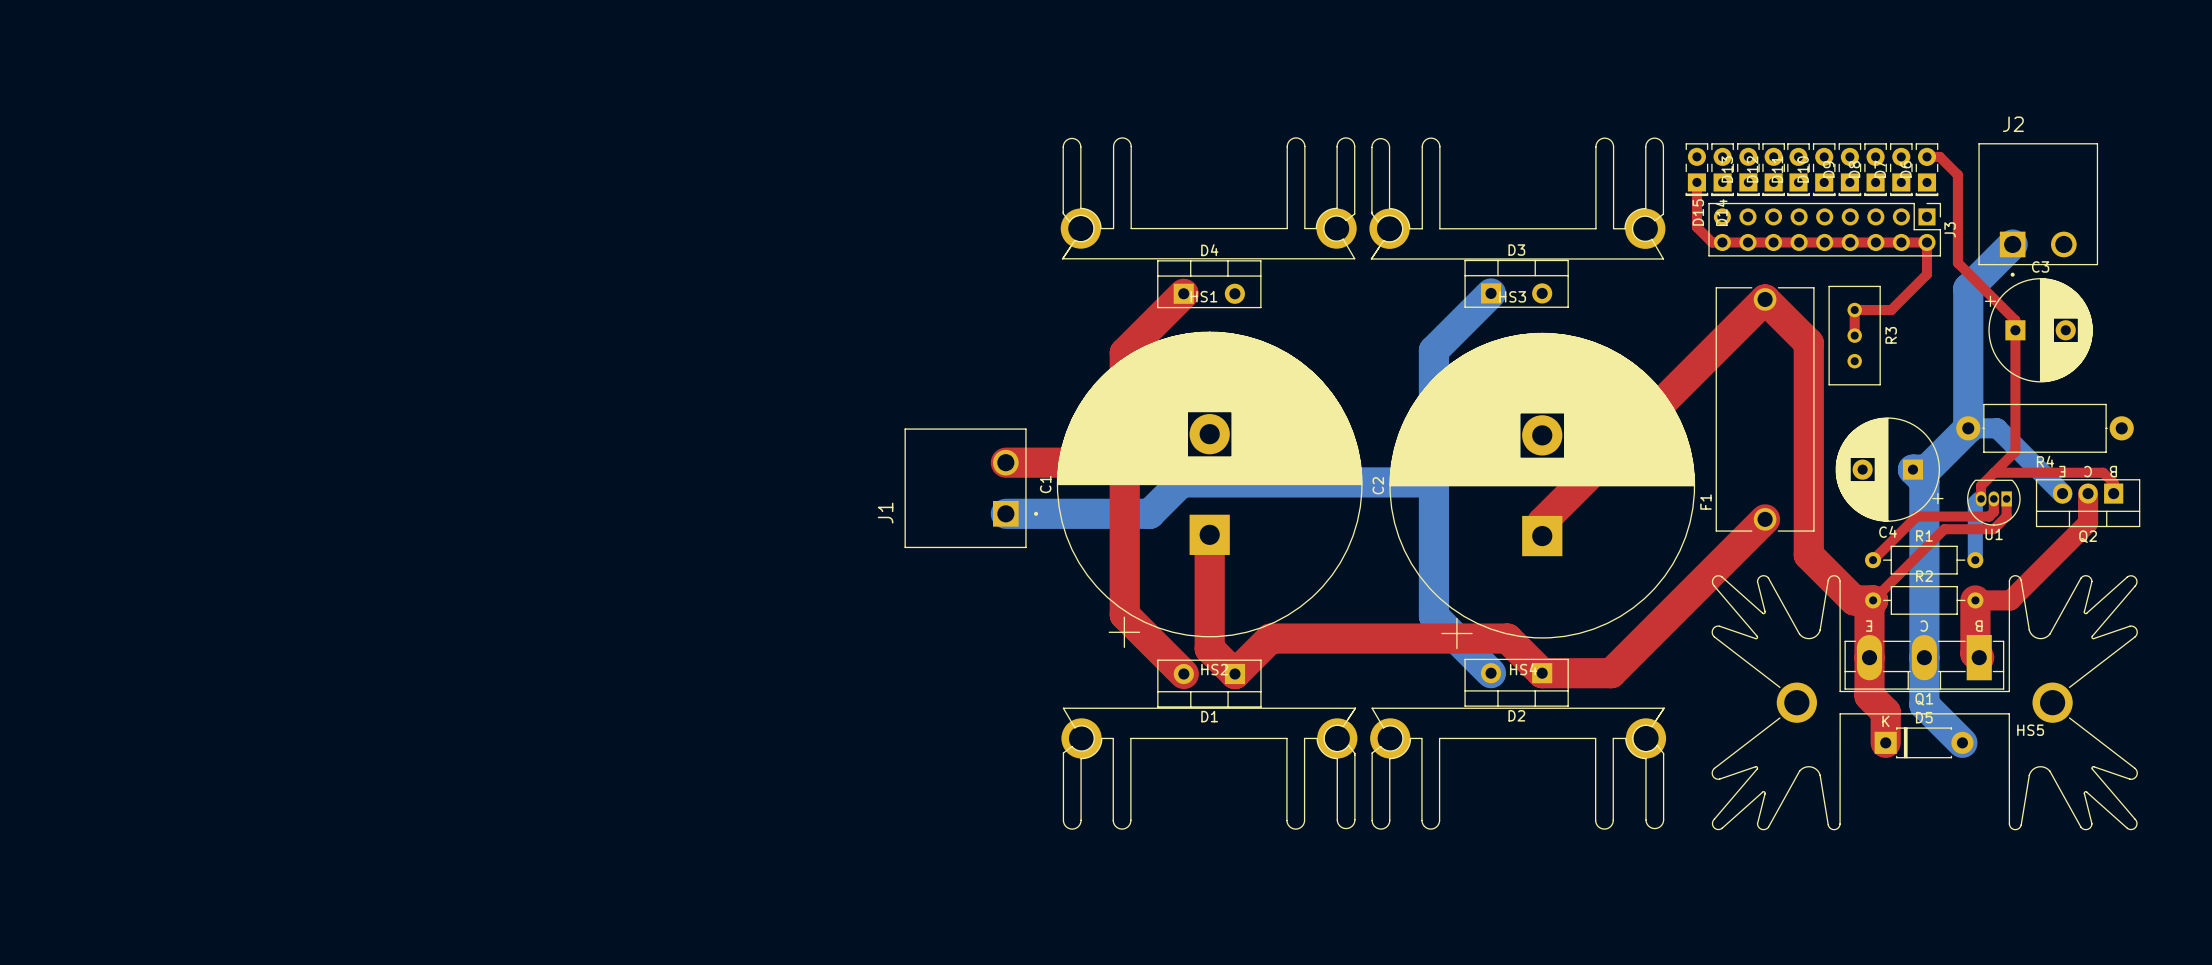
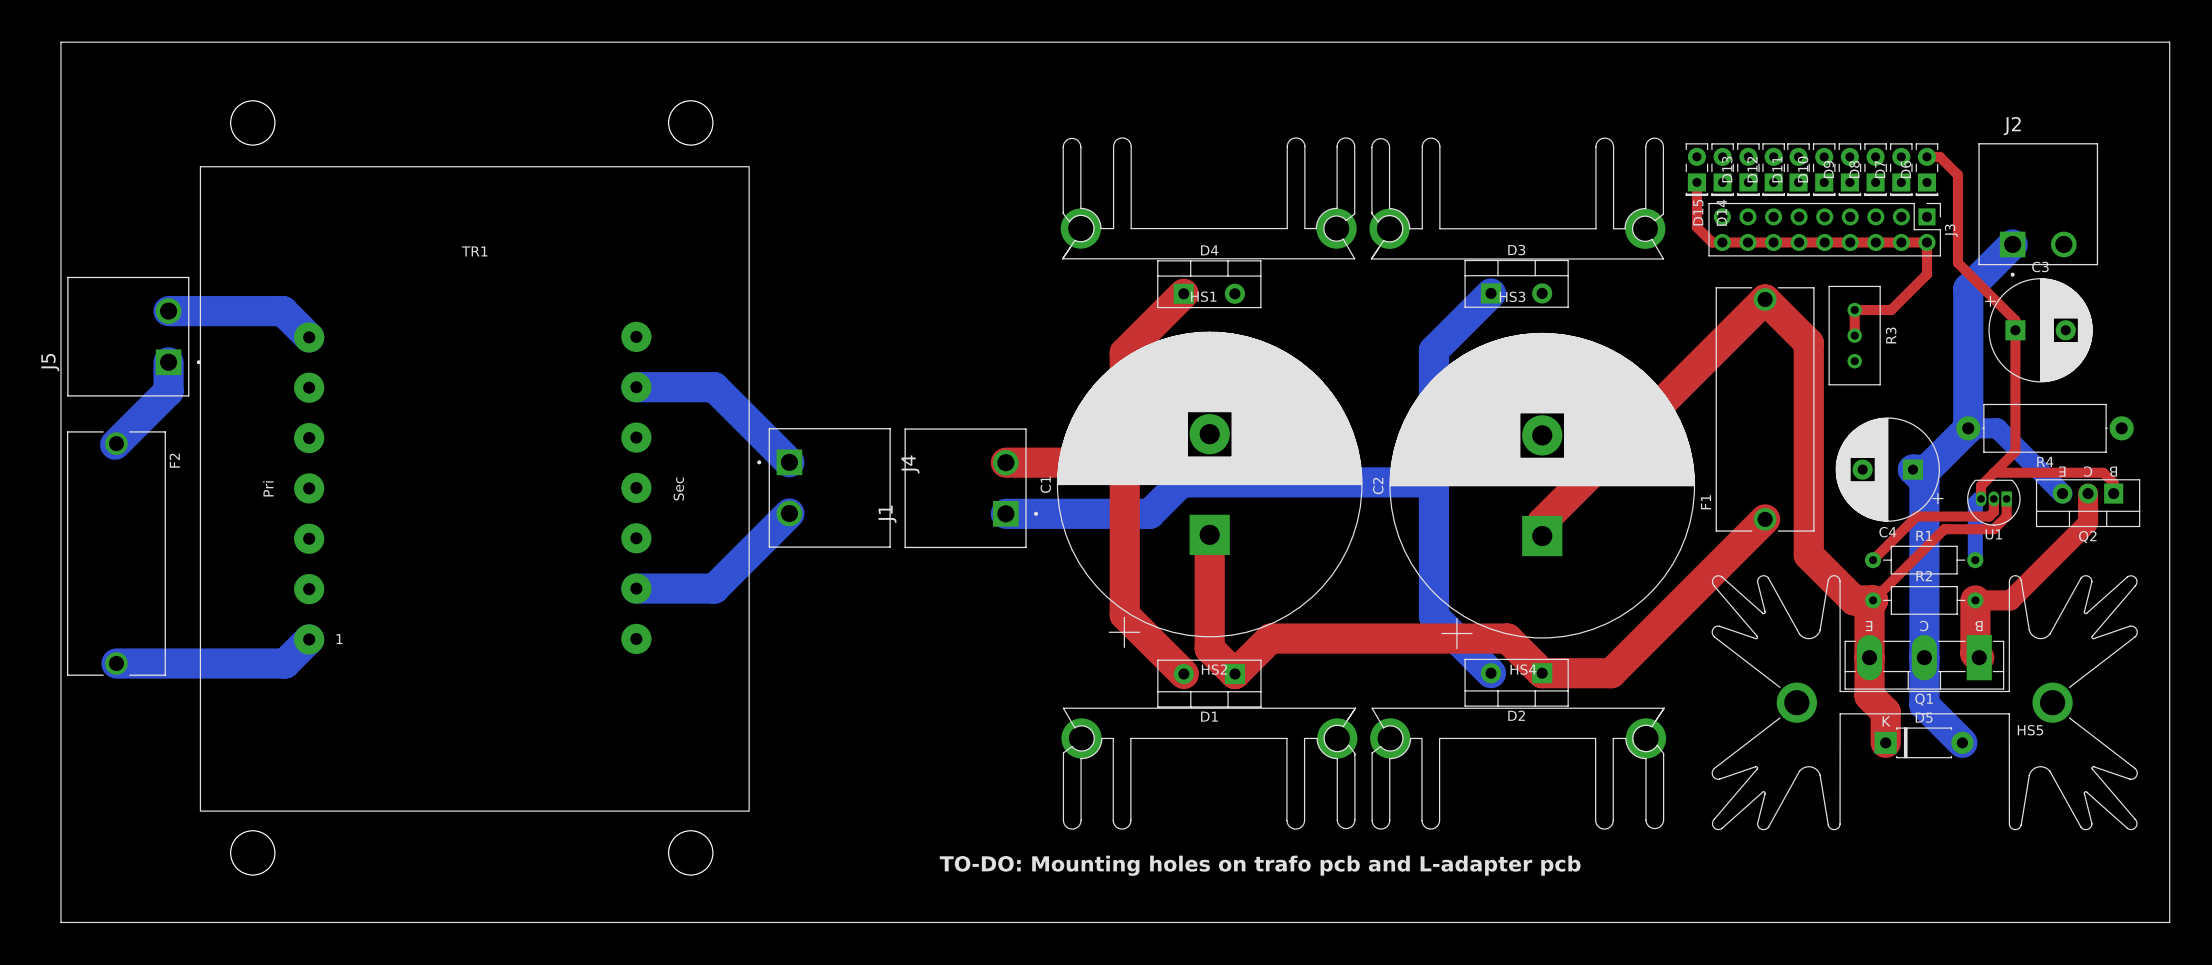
line: none -> (60, 42) (2169, 42) (2169, 922) (60, 922) (60, 42)
bottom track: none -> (168, 311) (282, 311) (309, 337)
J5: none -> (134, 336)
bottom track: none -> (168, 362) (168, 391) (115, 444)
bottom track: none -> (636, 387) (714, 387) (789, 462)
TR1: none -> (474, 487)
J4: none -> (823, 487)
bottom track: none -> (789, 513) (714, 588) (636, 588)
F2: none -> (116, 553)
bottom track: none -> (309, 639) (285, 663) (116, 663)
text: none -> TO-DO: Mounting holes on trafo pcb and L-adapter pcb (1260, 865)

